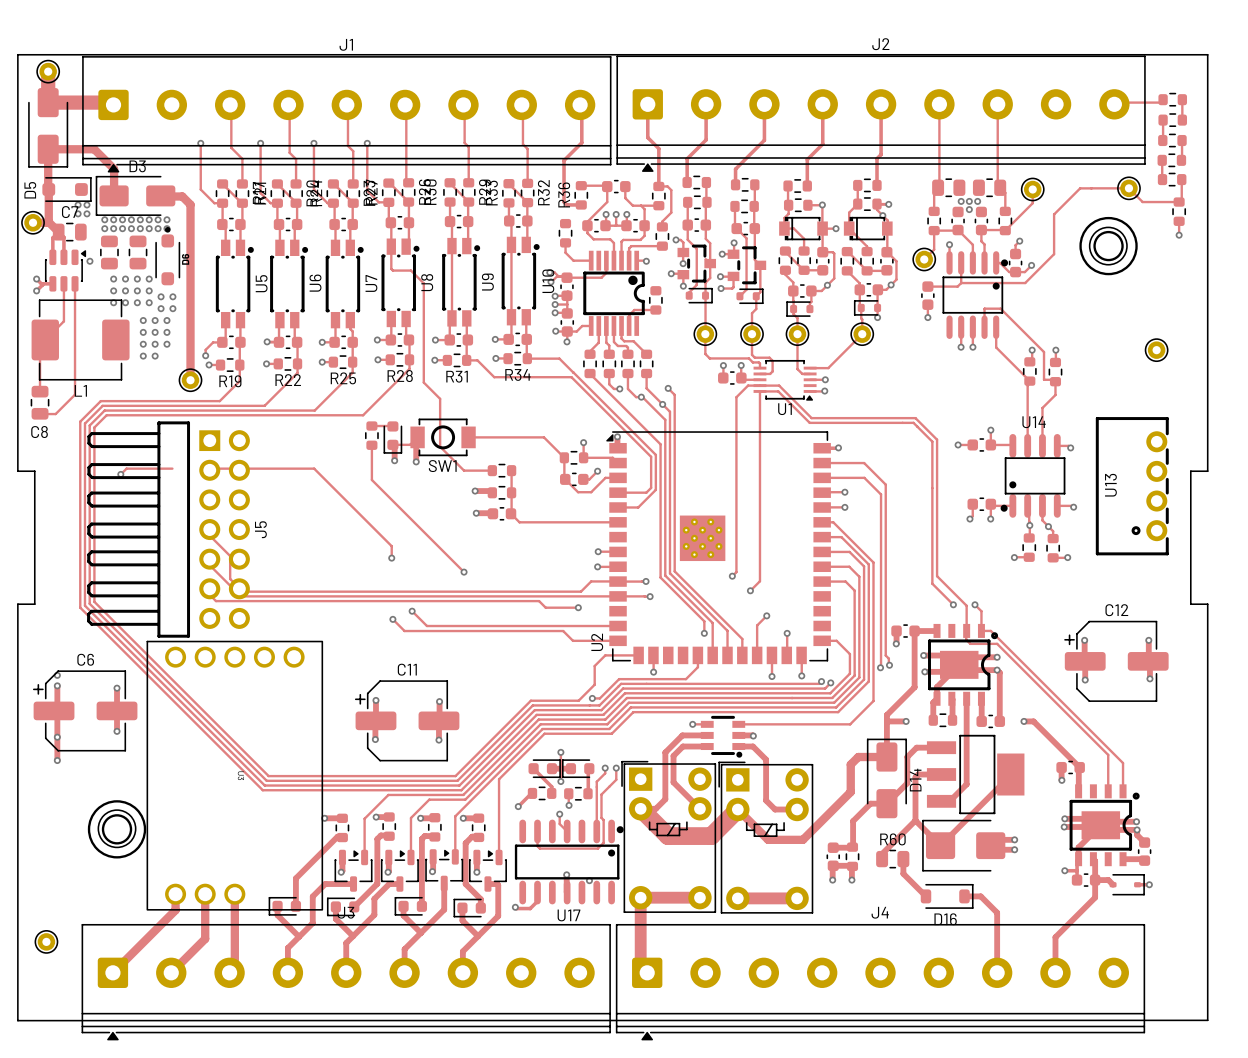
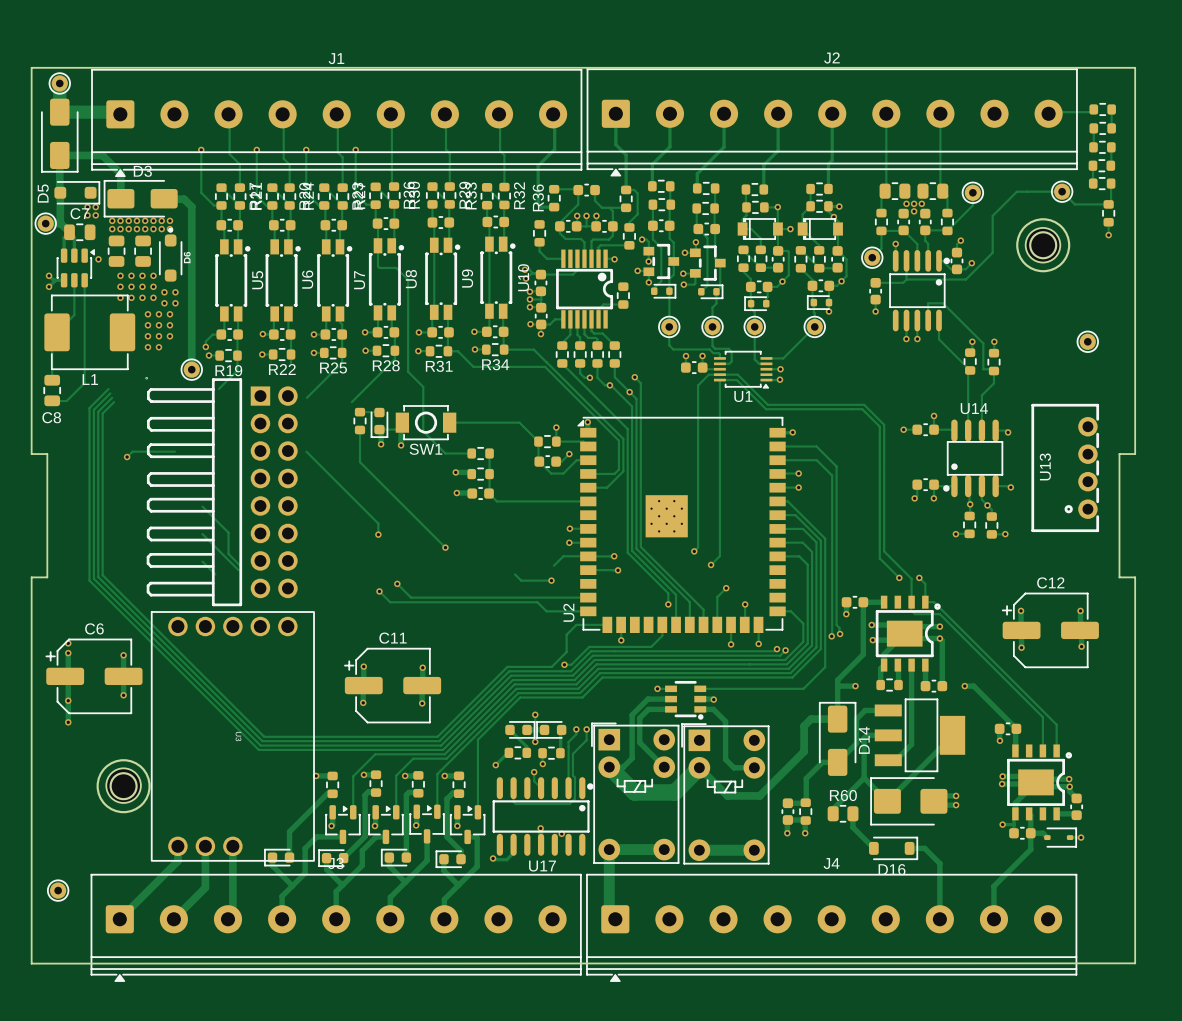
track: (297, 372) (264, 405) (102, 405) -> none
track: (100, 401) (219, 401) -> none
track: (104, 410) (314, 410) -> none
track: (106, 415) (363, 415) -> none
track: (202, 468) (314, 468) -> none
part: none -> (221, 491)
J5: (168, 529) -> none
track: (242, 591) (580, 591) -> none
track: (240, 596) (618, 596) -> none
track: (215, 601) (539, 601) -> none

